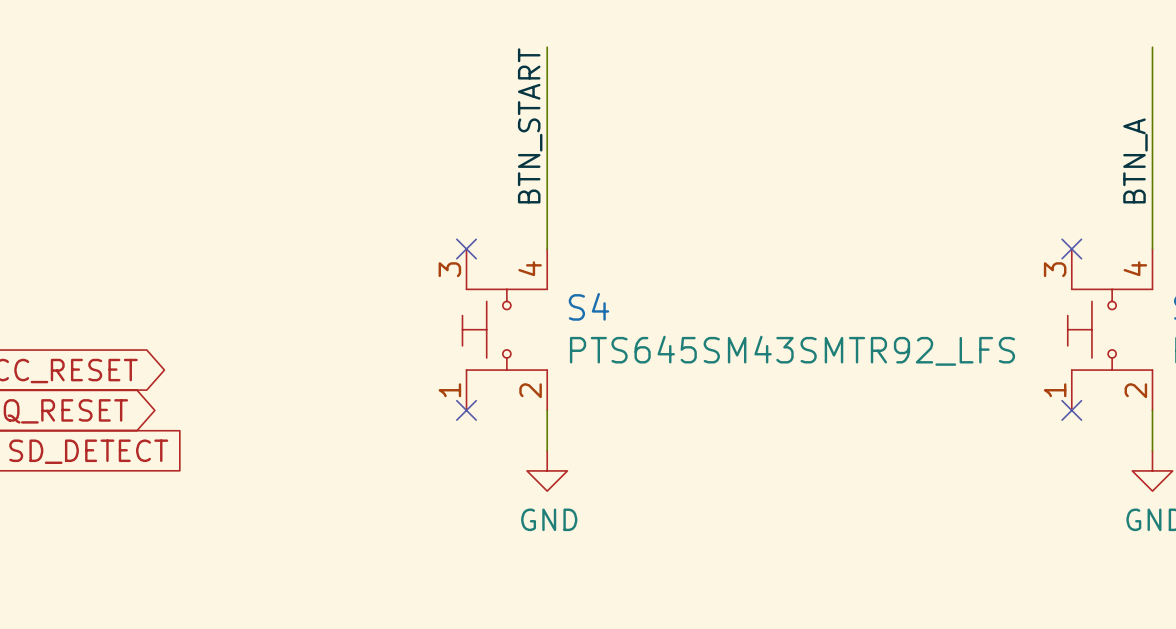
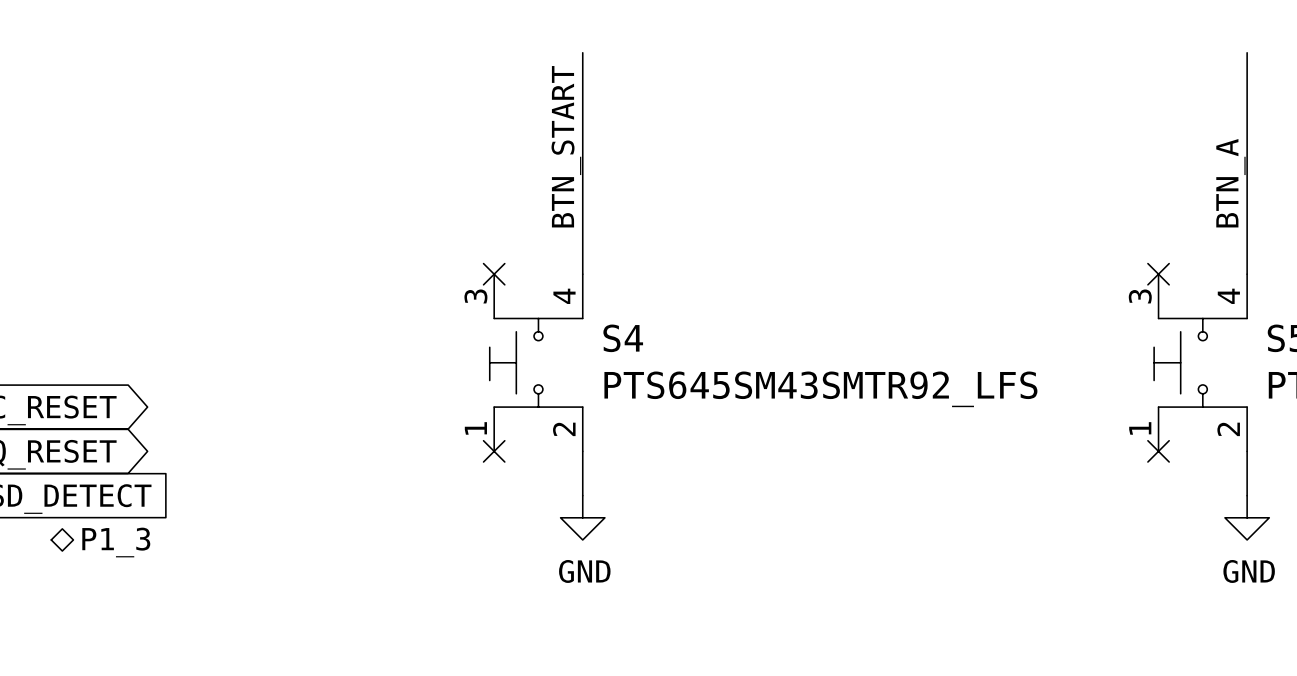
hierarchical label: none -> P1_3 (116, 542)

